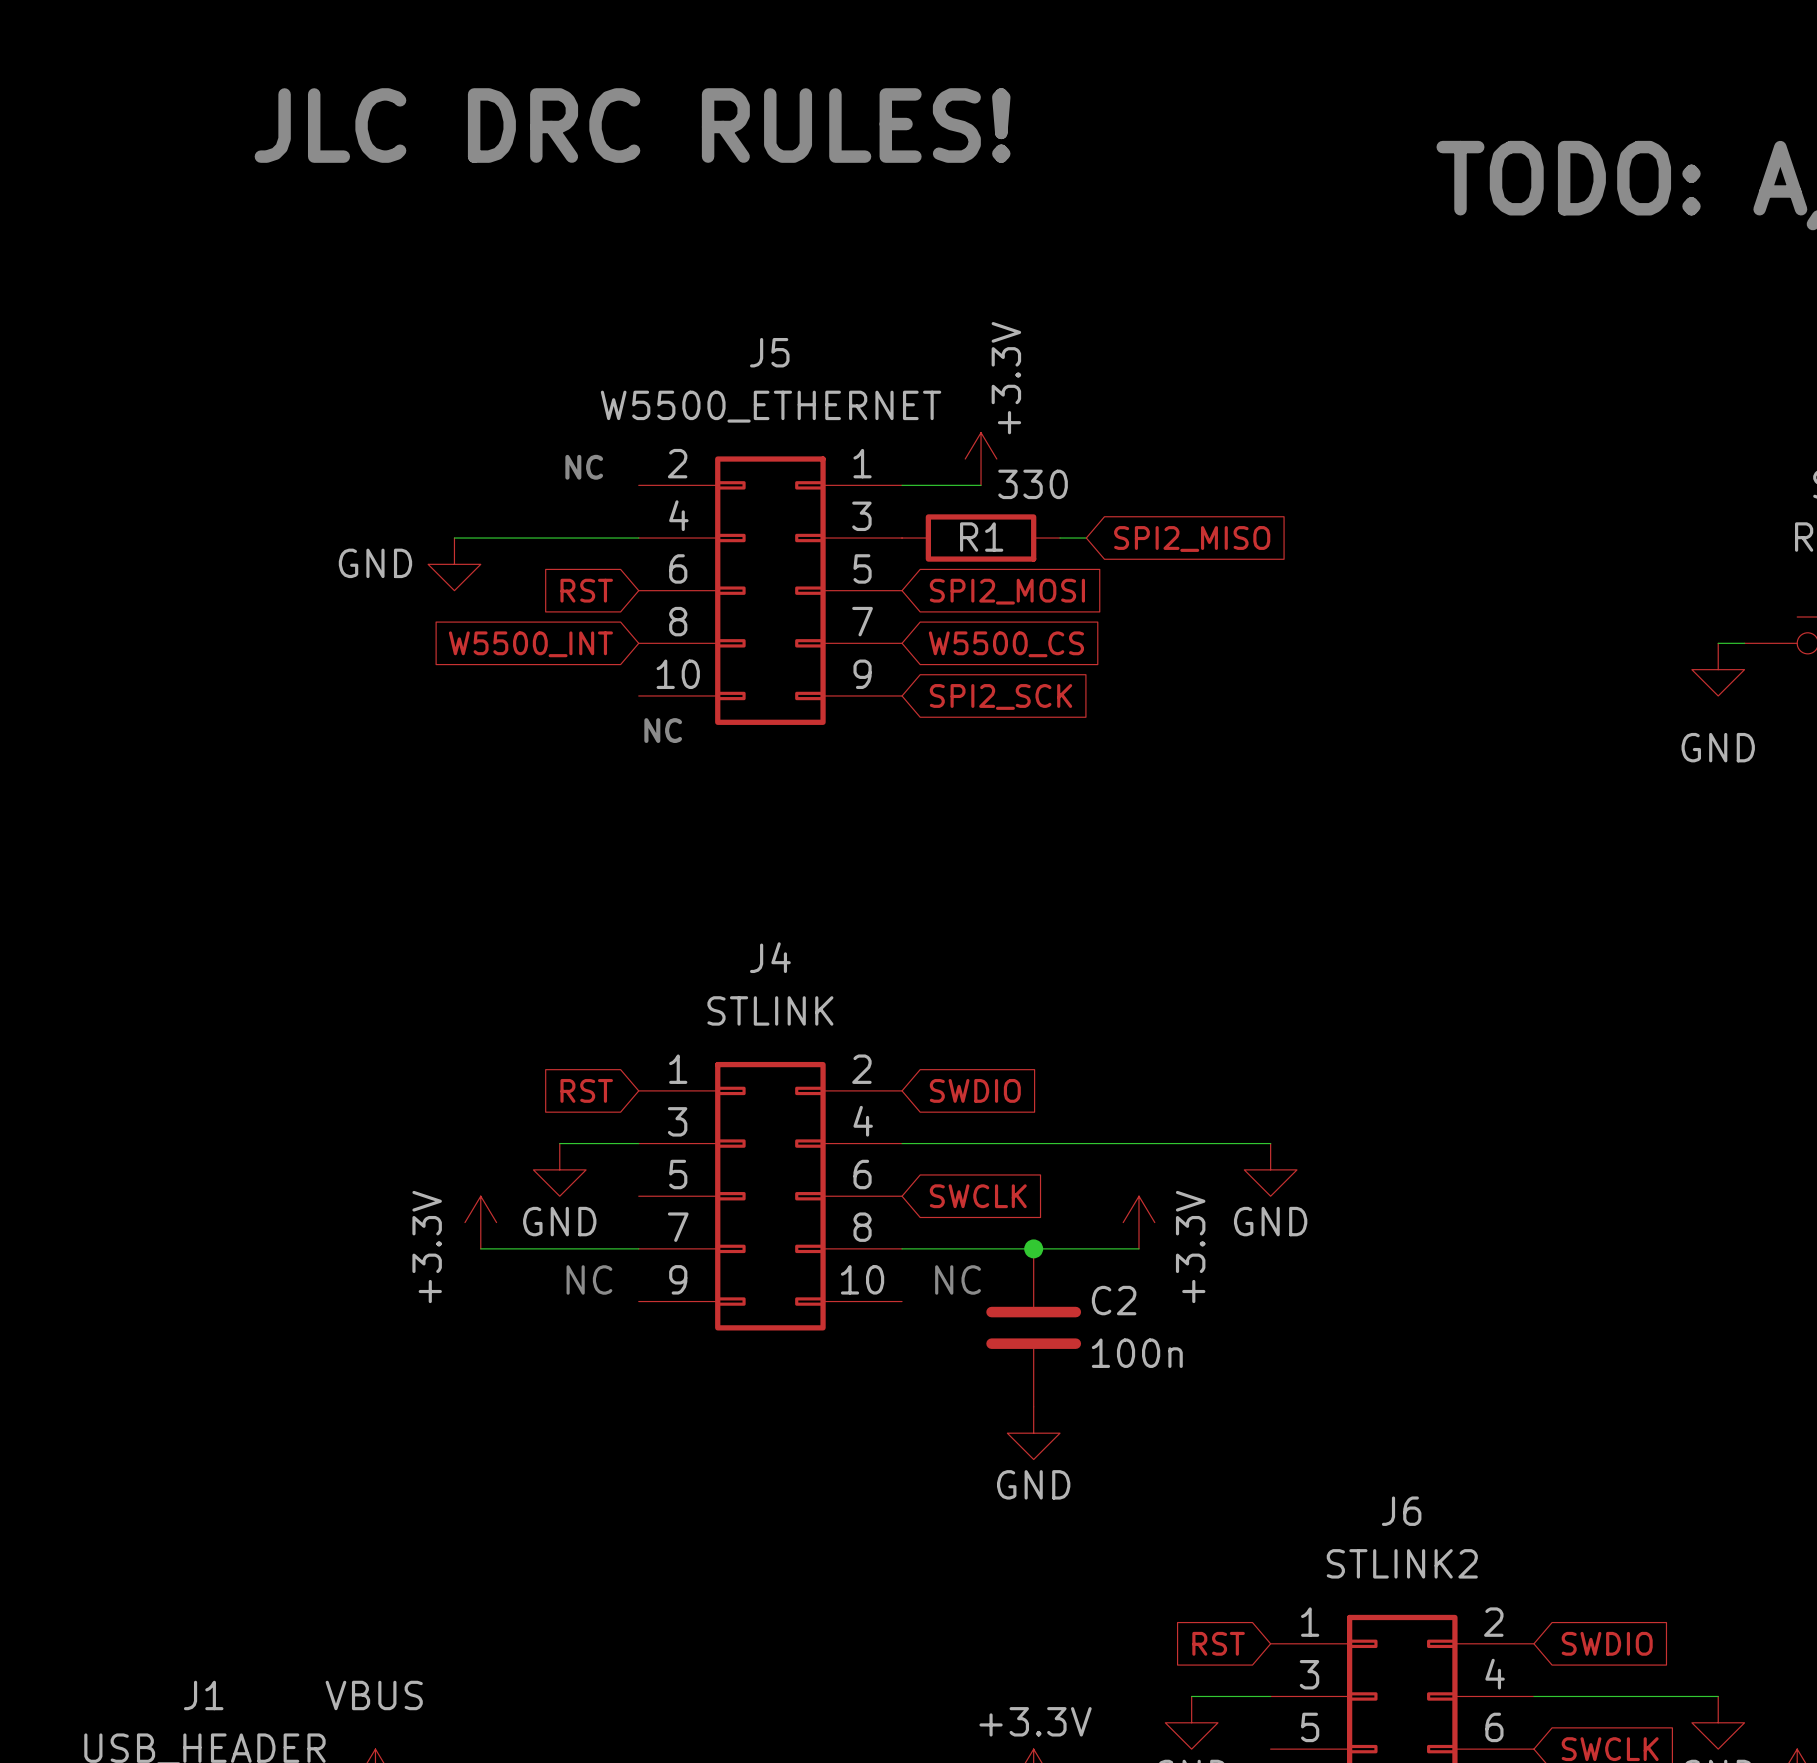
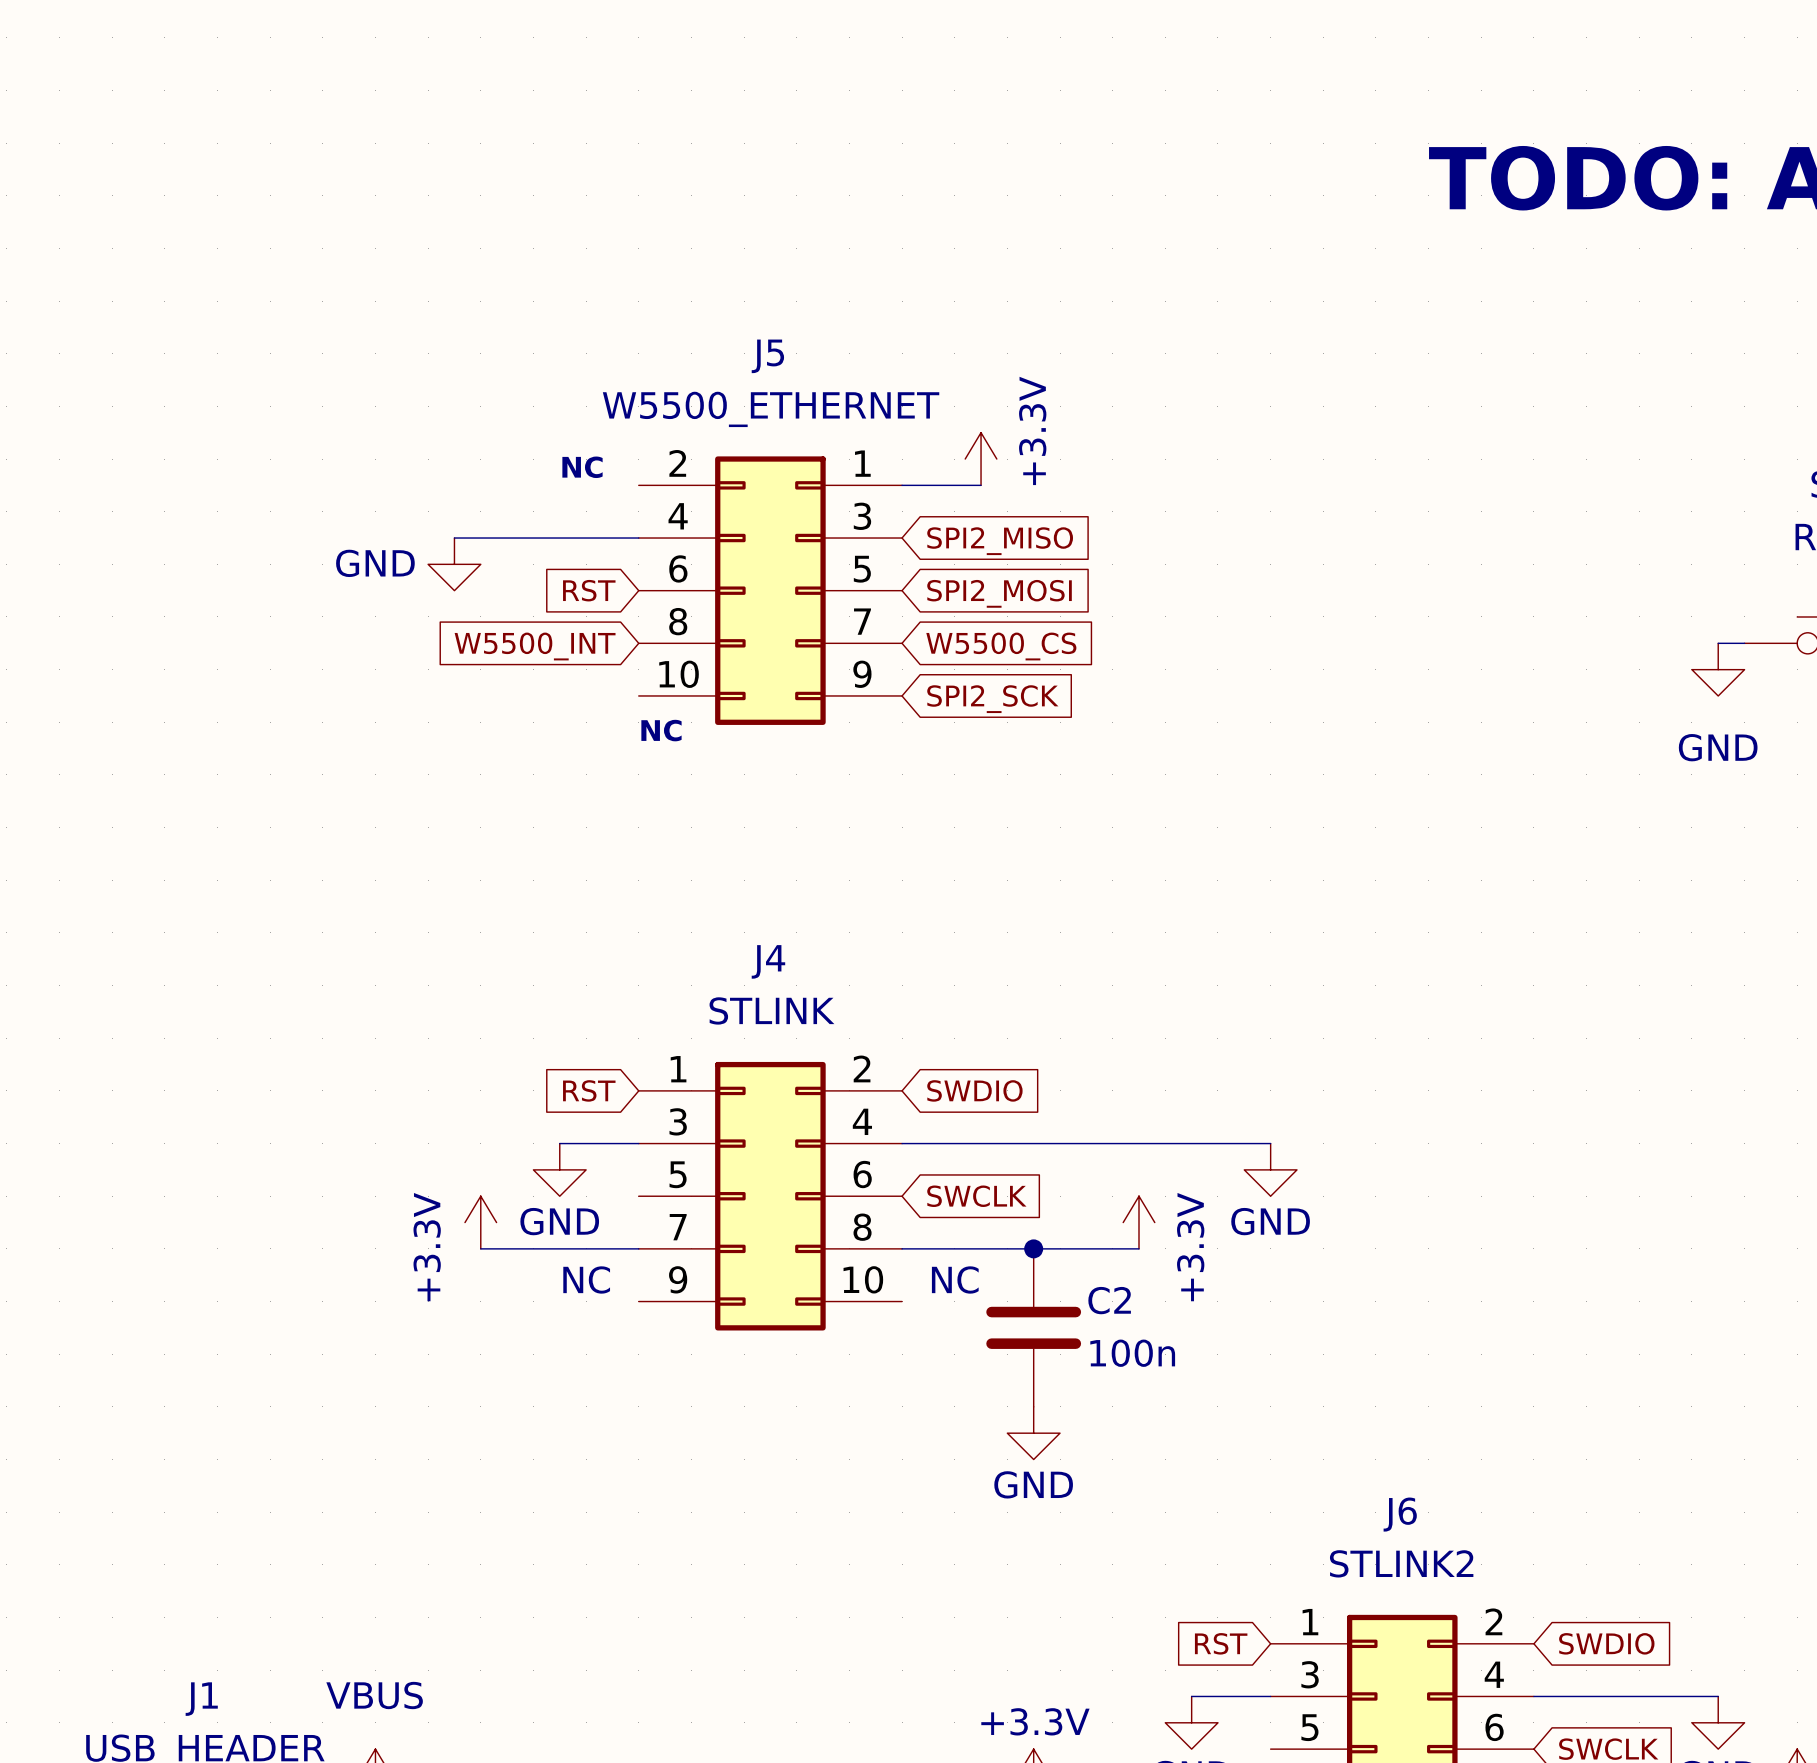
text: JLC DRC RULES! (632, 125) -> none
power symbol text position: +3.3V (1006, 378) -> +3.3V (1032, 430)
R1: 330 (981, 538) -> none
wire: (1060, 538) (1086, 538) -> none
global label position: SPI2_MISO (1192, 539) -> SPI2_MISO (1000, 541)

